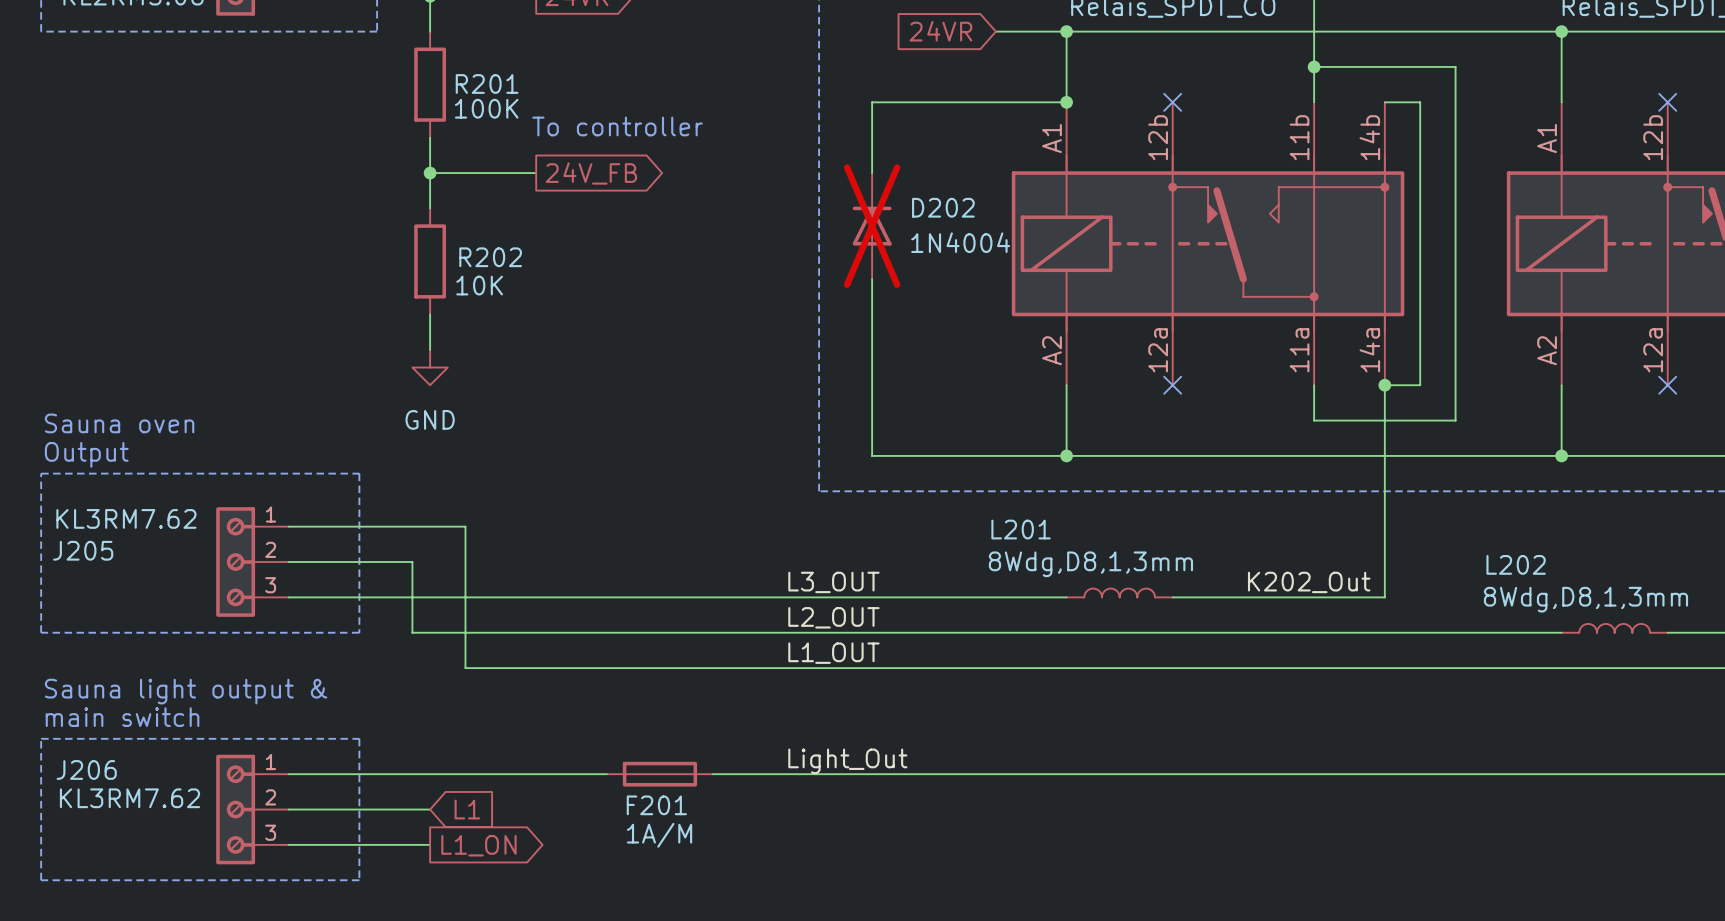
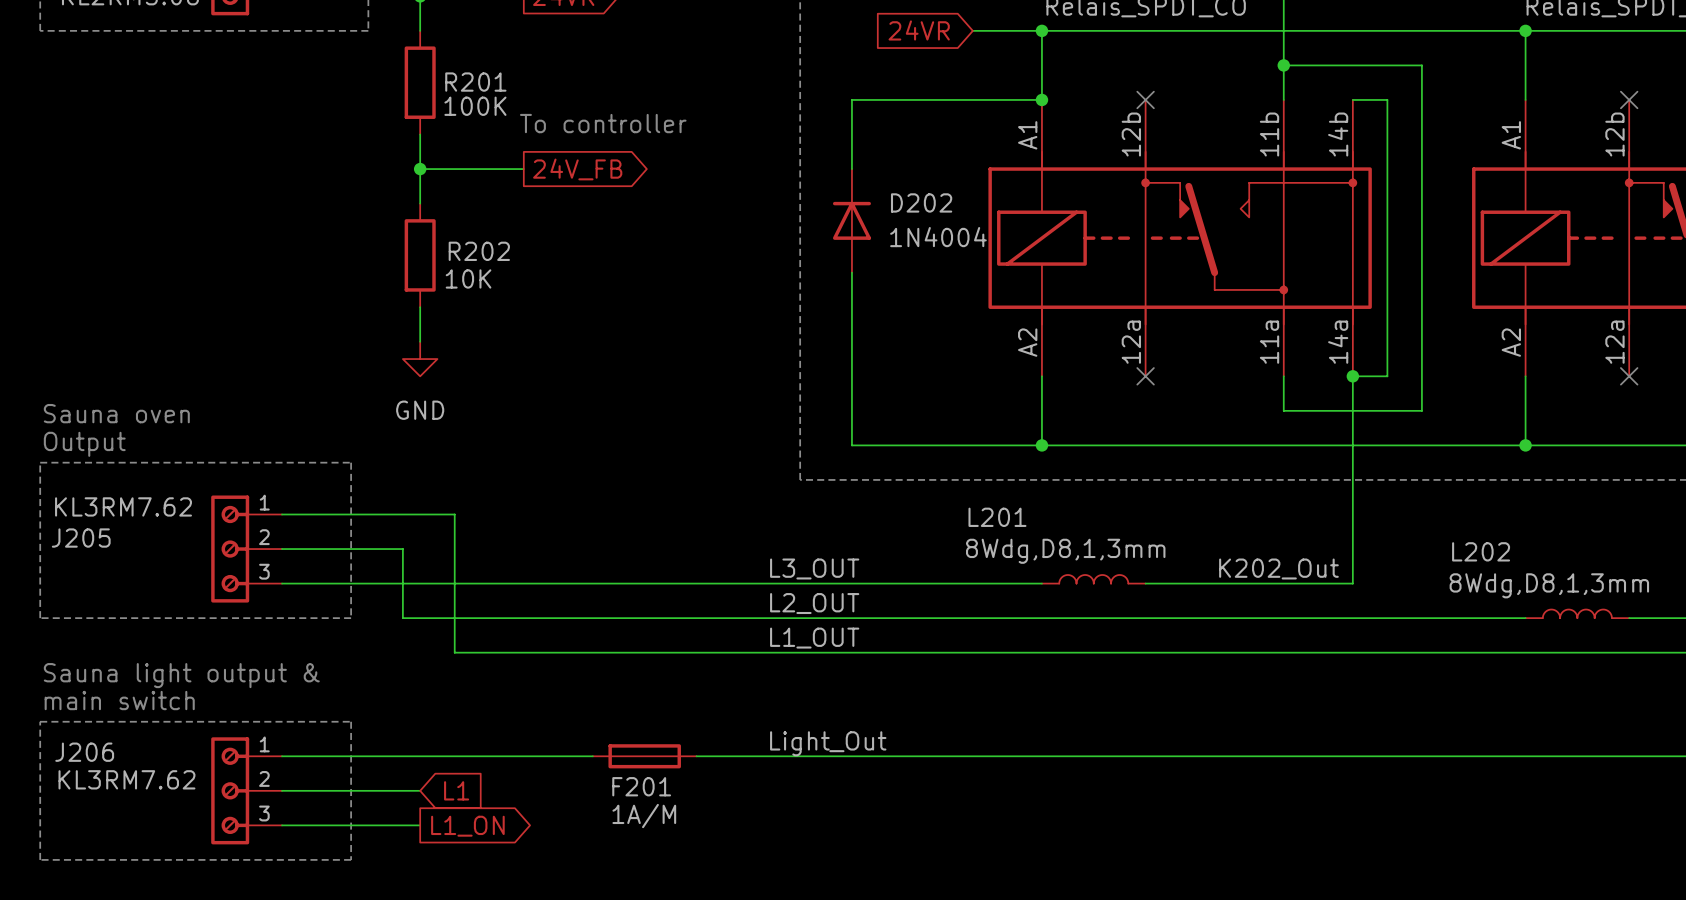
D202 do-not-place cross: (872, 226) -> none

